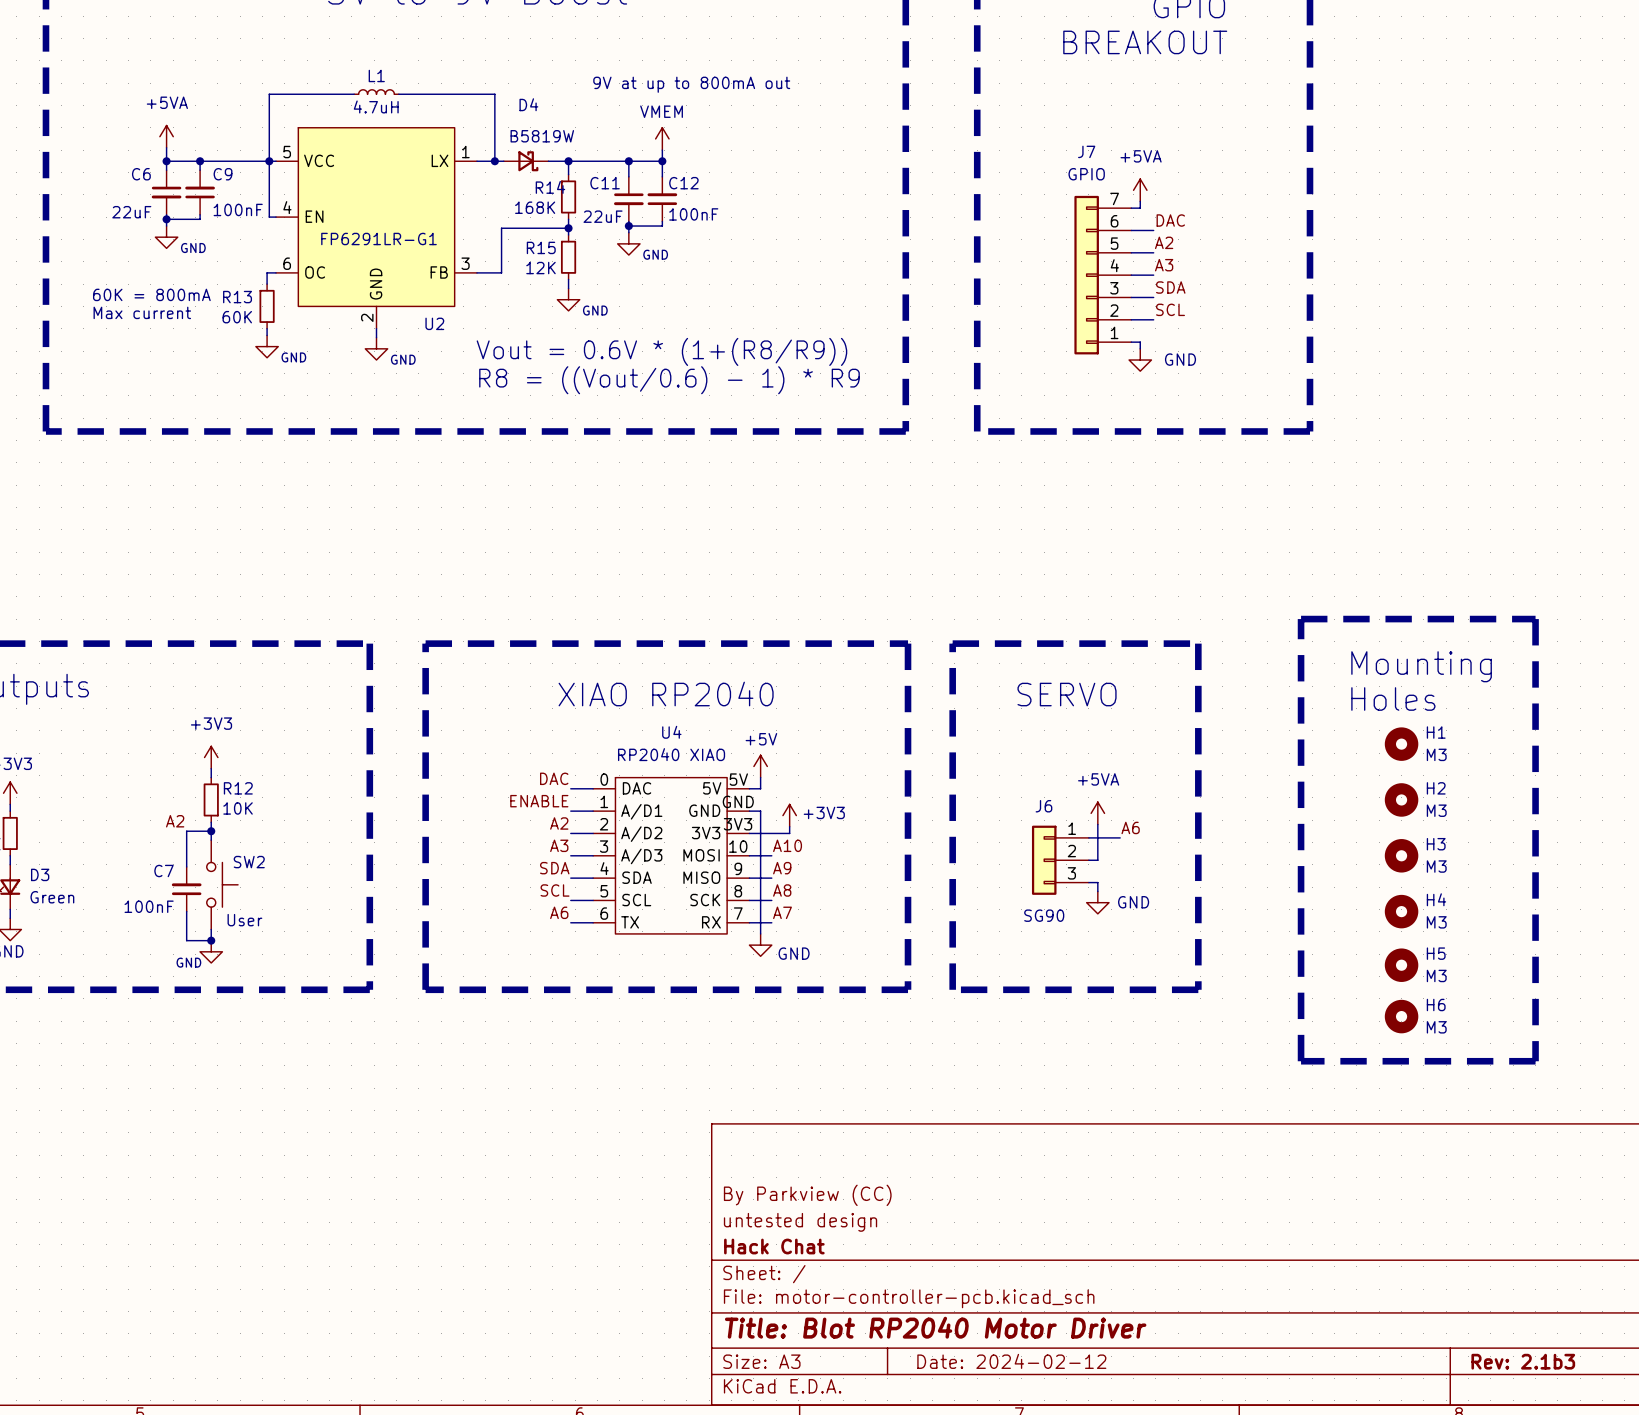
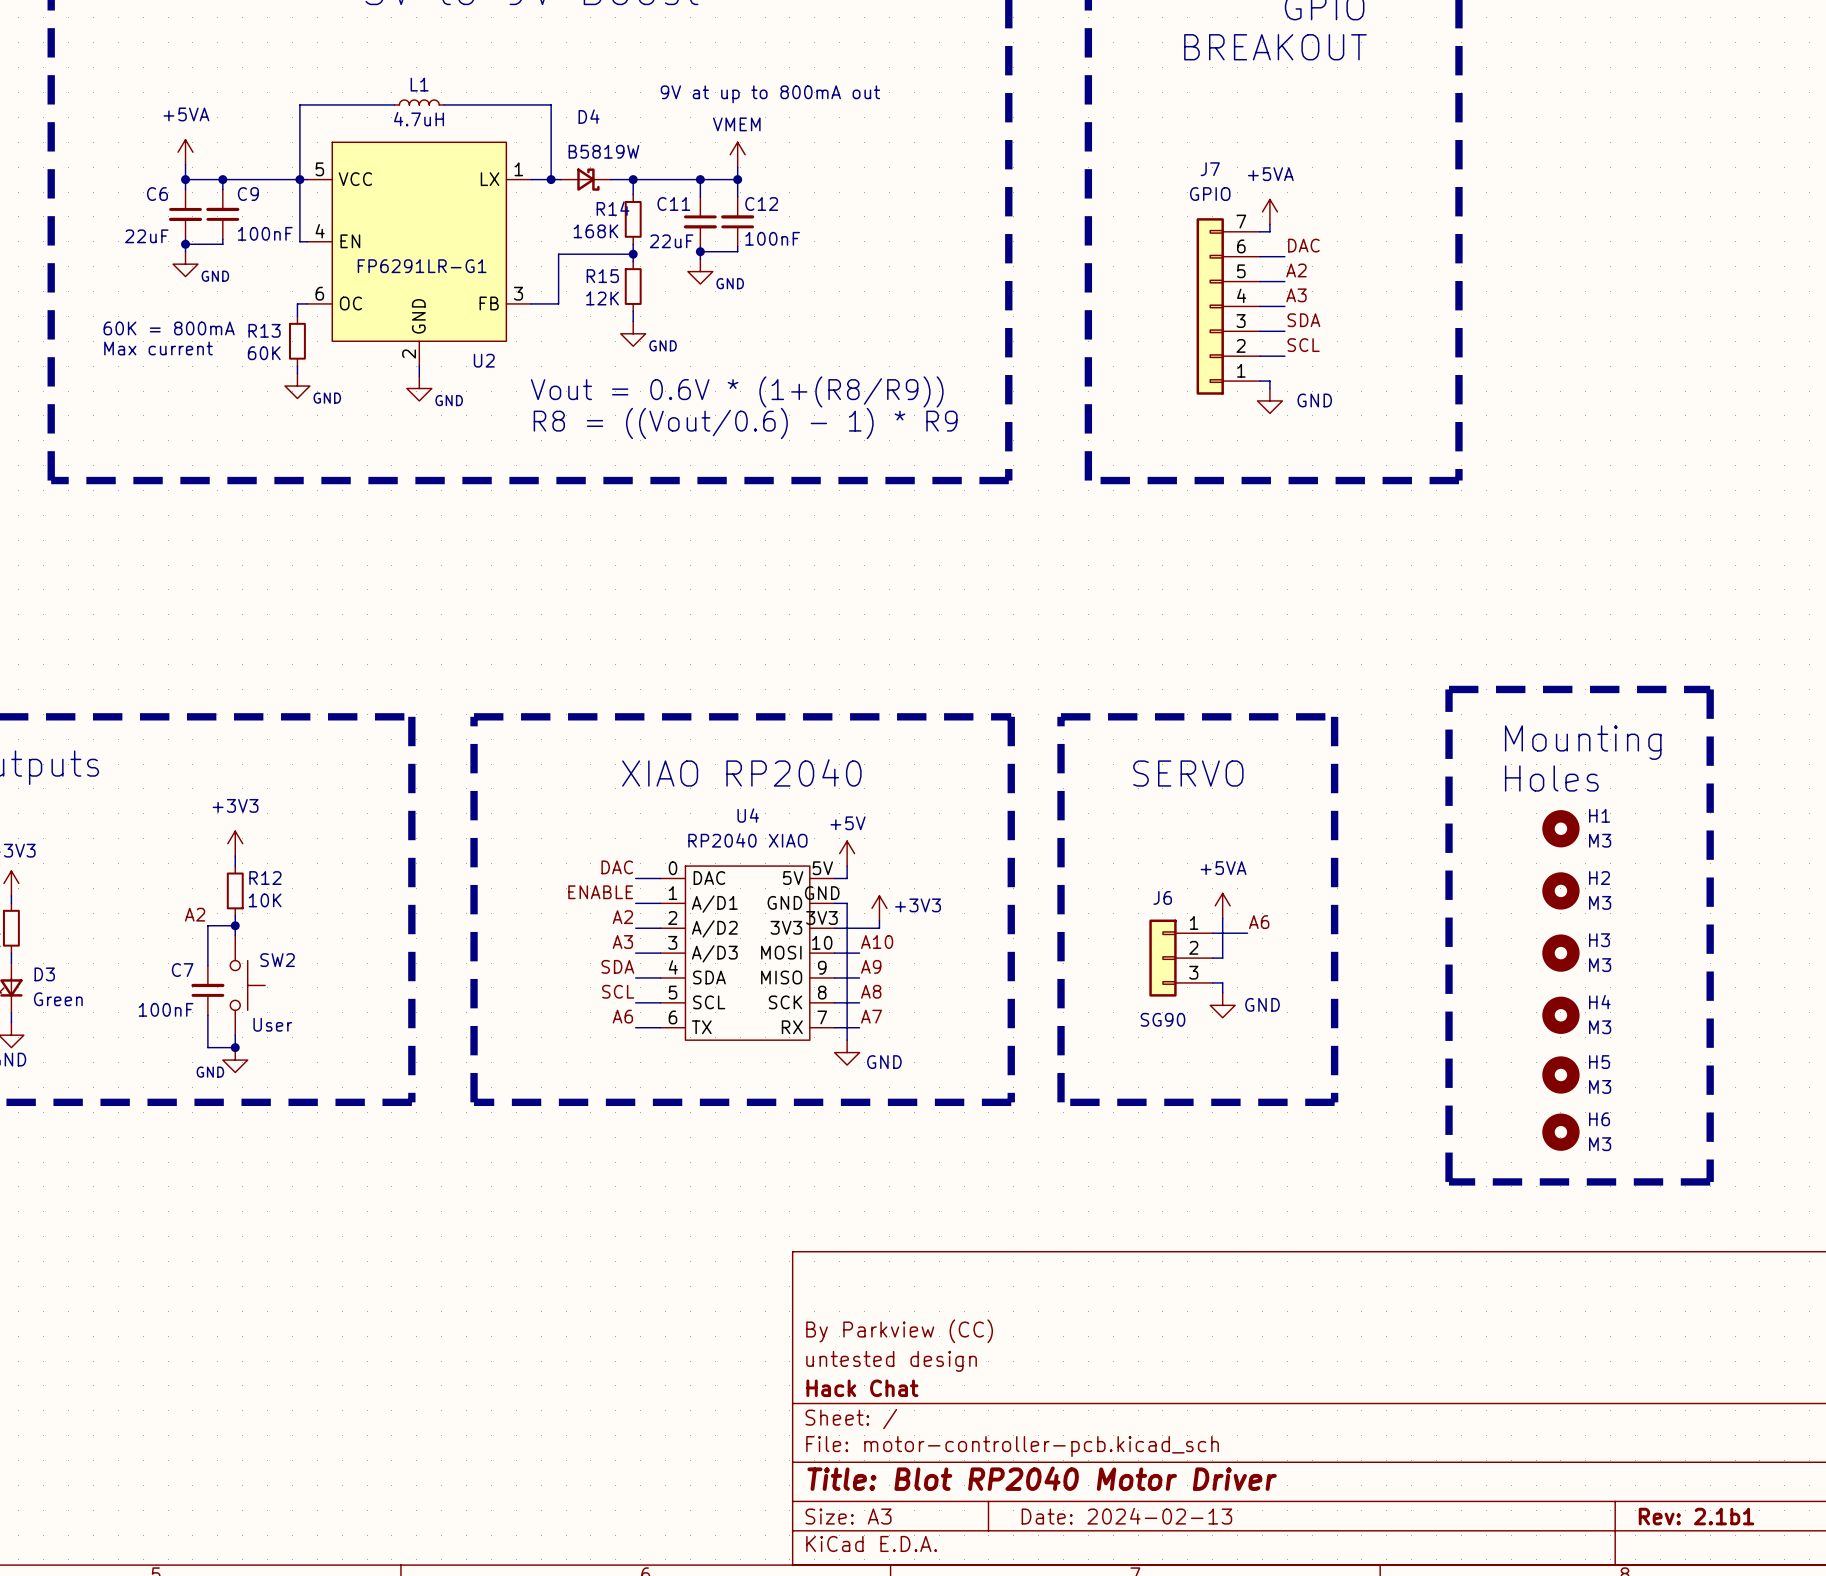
title block: Date: 2024-02-12 (1011, 1361) -> Date: 2024-02-13 (1126, 1516)
title block: Rev: 2.1b3 (1523, 1361) -> Rev: 2.1b1 (1696, 1516)

